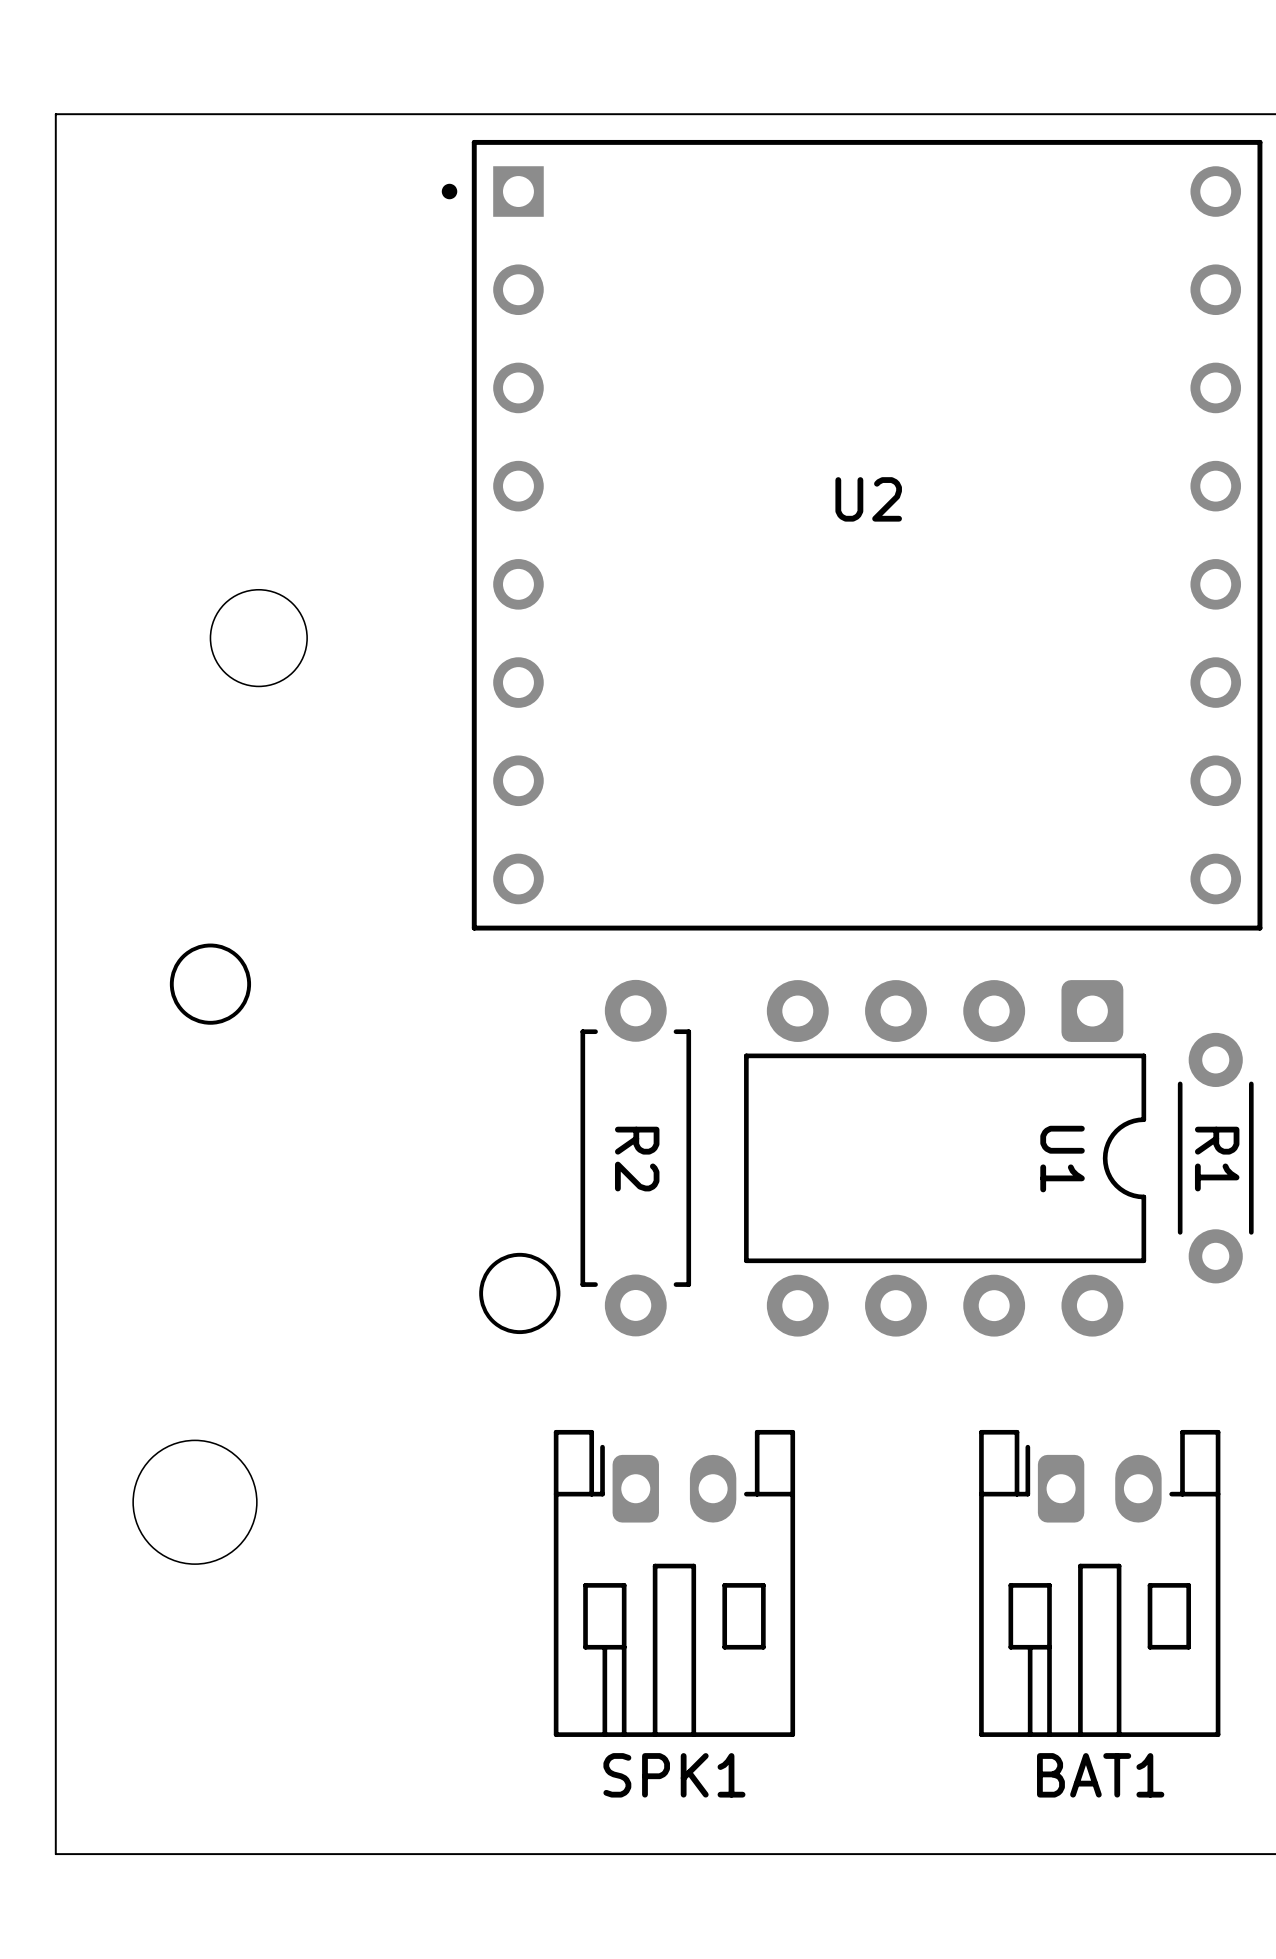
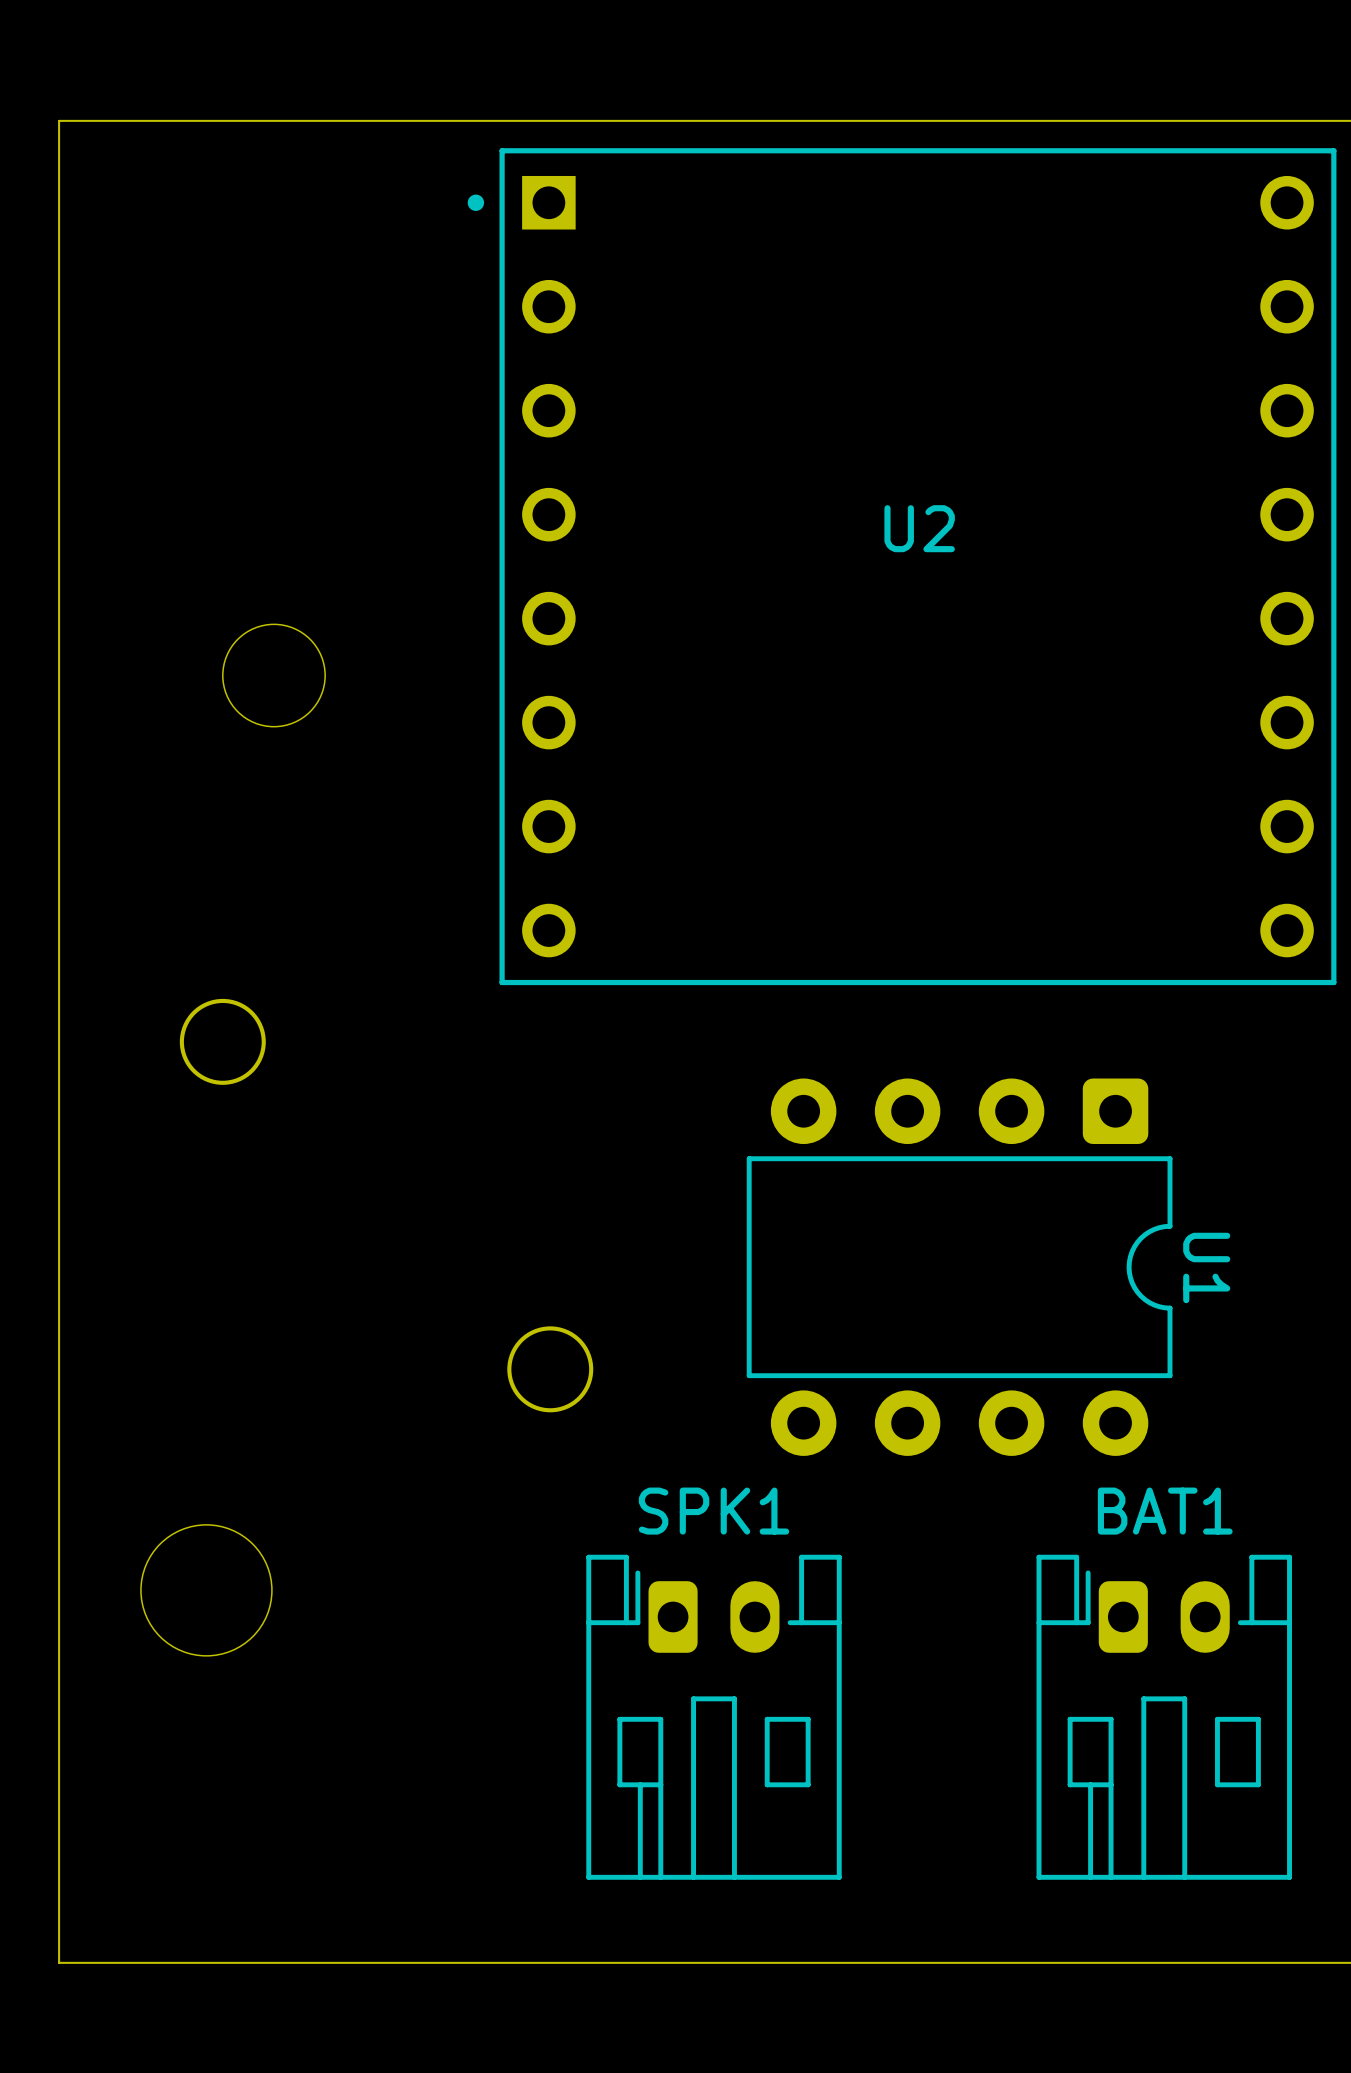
R2: (635, 1158) -> none
U1 position: (945, 1158) -> (959, 1267)
R1: (1215, 1158) -> none
U1 name position: U1 (1062, 1159) -> U1 (1206, 1267)
SPK1 position: (674, 1583) -> (714, 1717)
BAT1 position: (1099, 1583) -> (1164, 1717)
SPK1 name position: SPK1 (674, 1775) -> SPK1 (714, 1511)
BAT1 name position: BAT1 (1100, 1775) -> BAT1 (1165, 1511)

